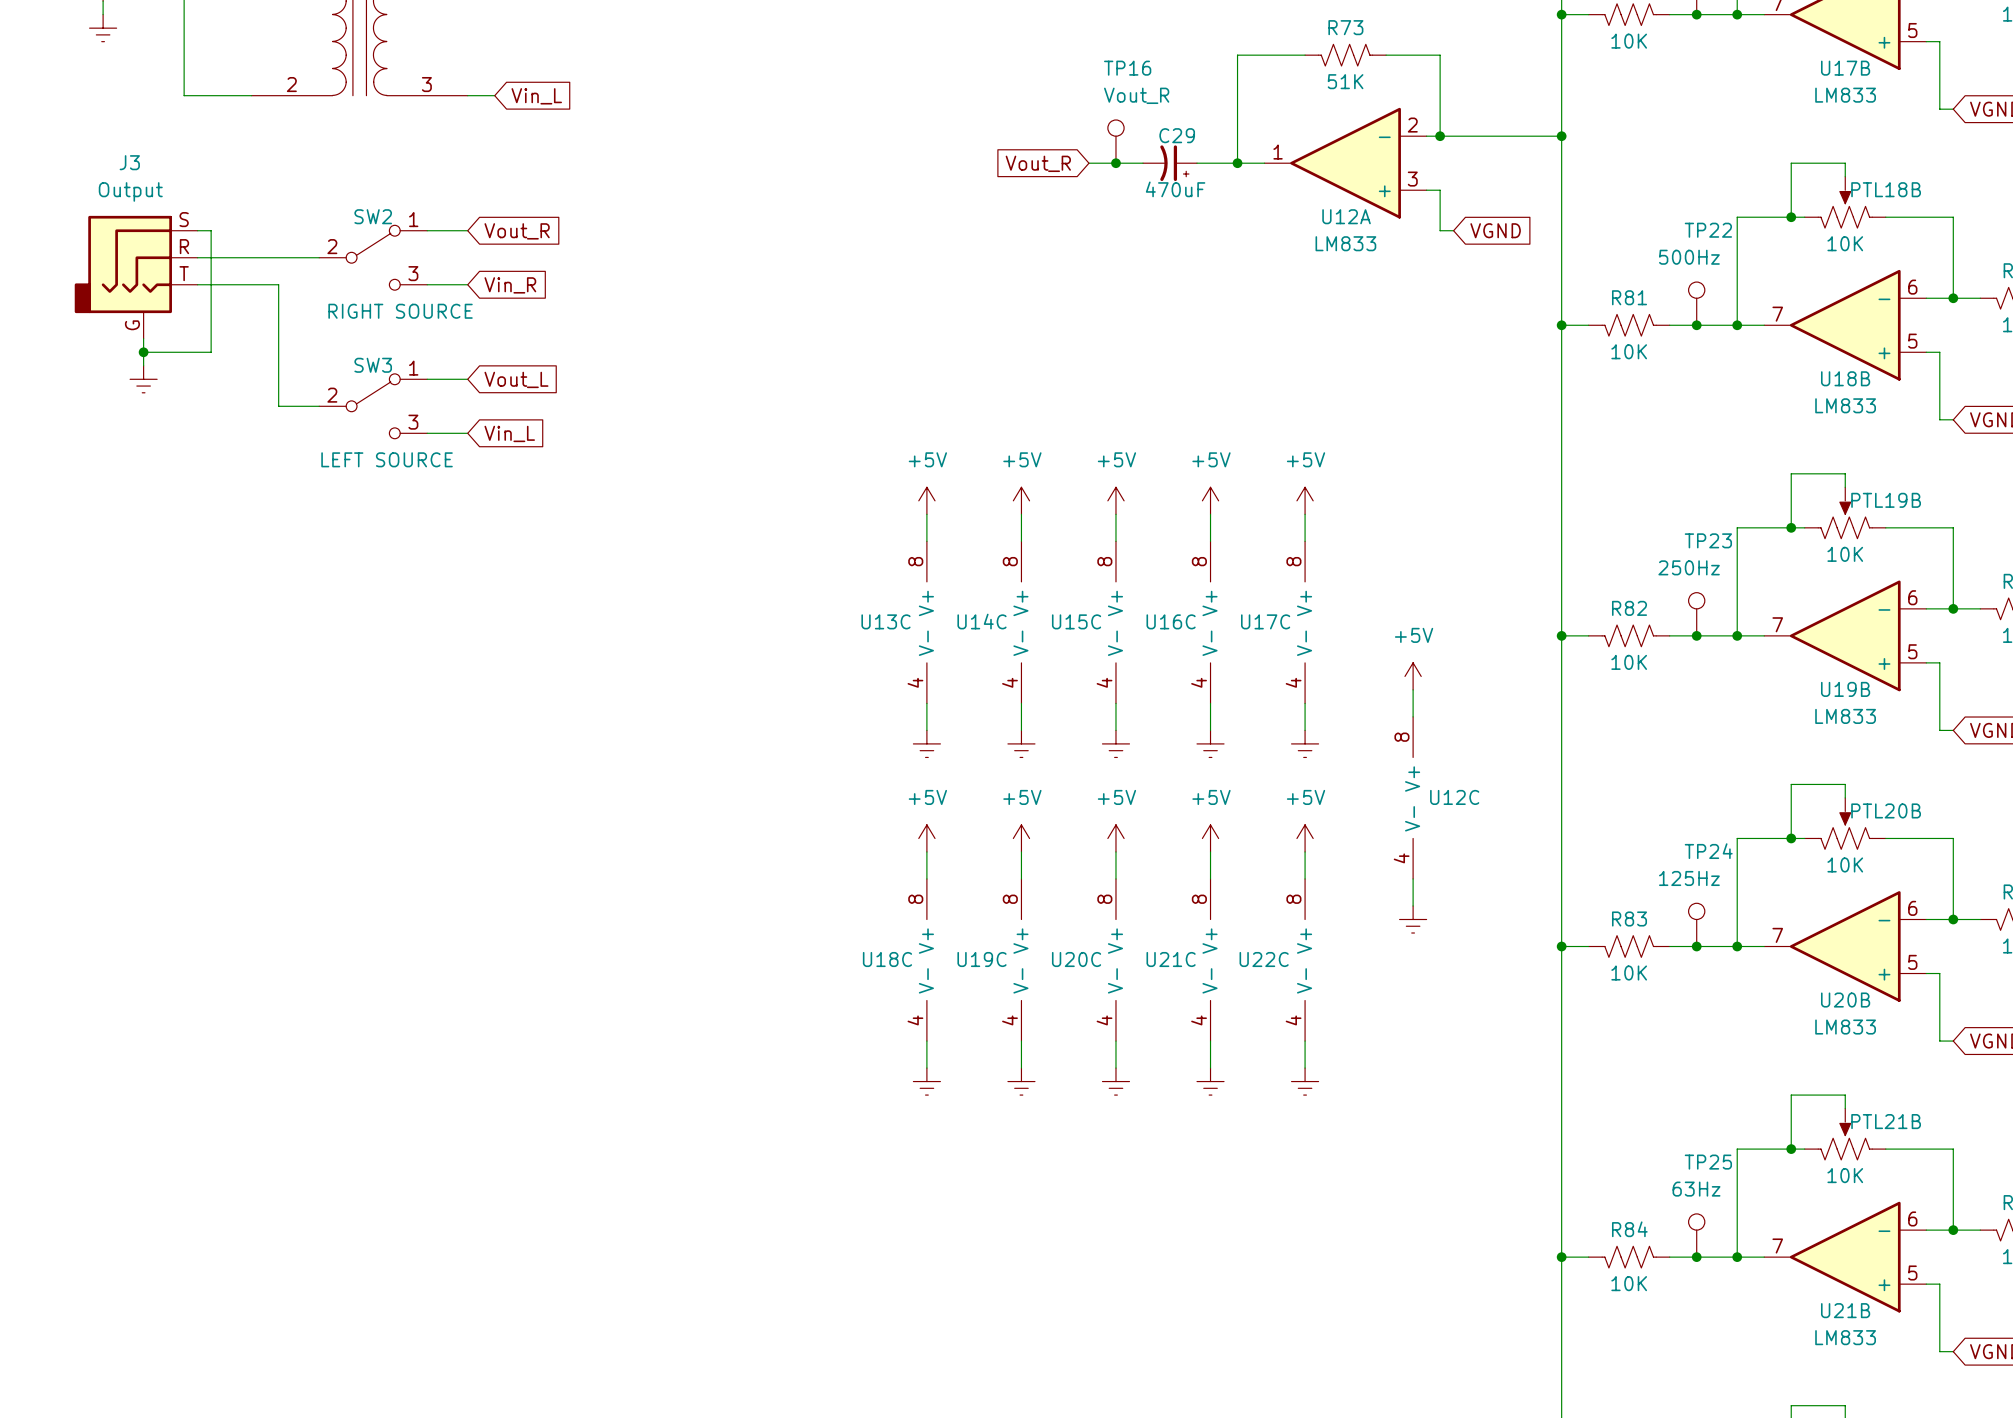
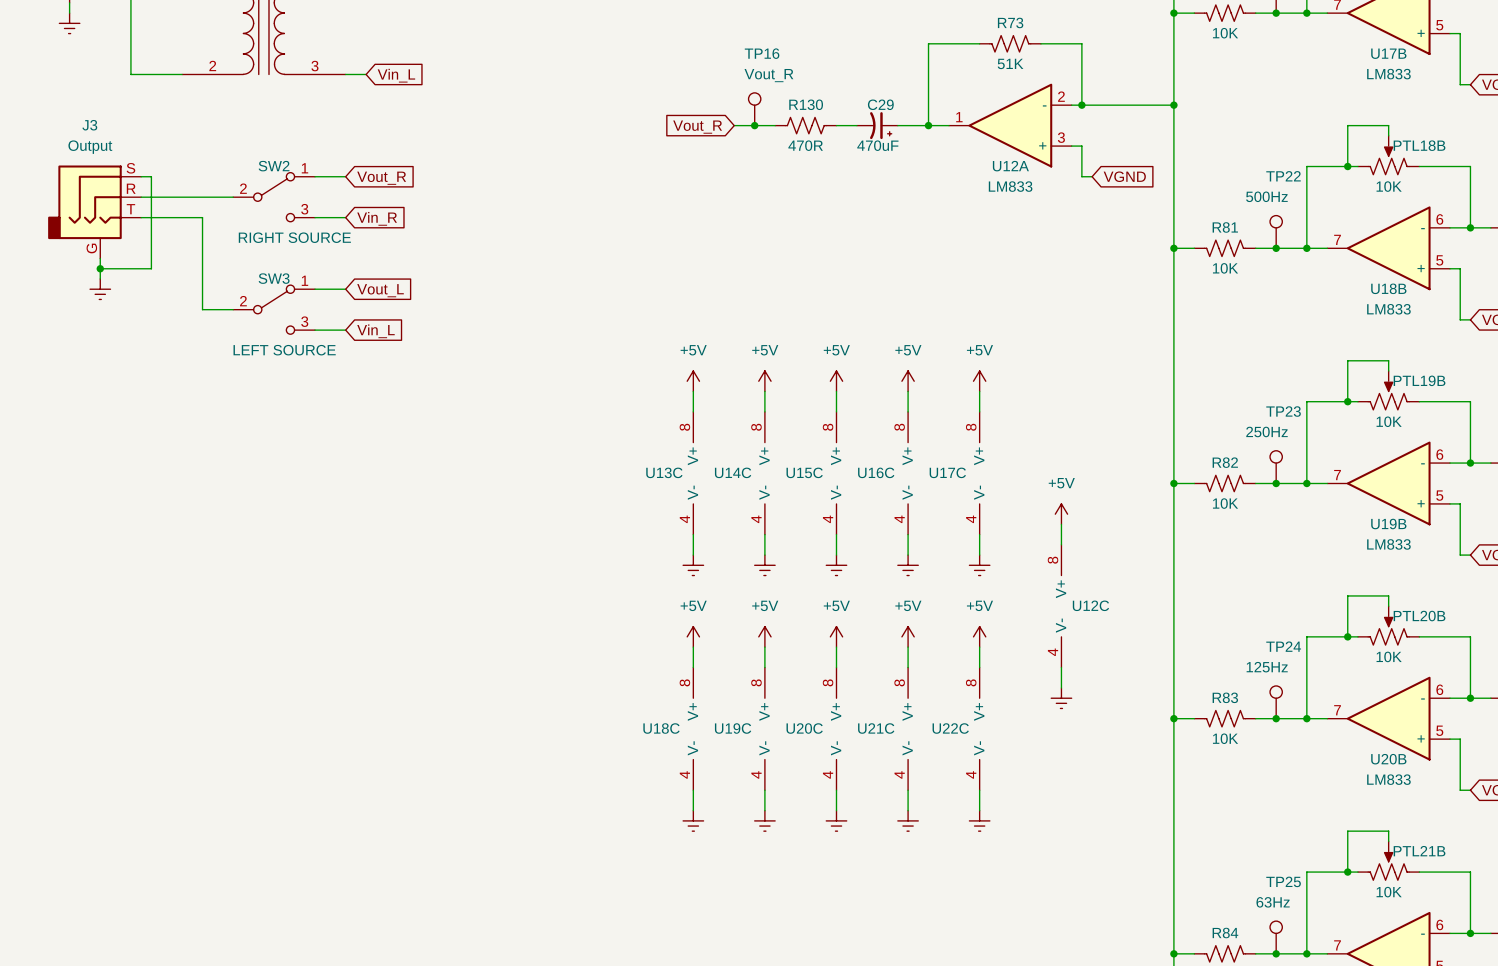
TP16 position: (1115, 141) -> (754, 109)
wire: none -> (734, 125) (775, 125)
junction: none -> (754, 125)
global label position: Vout_R (1038, 163) -> Vout_R (697, 127)
R130: none -> 470R (805, 125)
junction: (1115, 163) -> none

